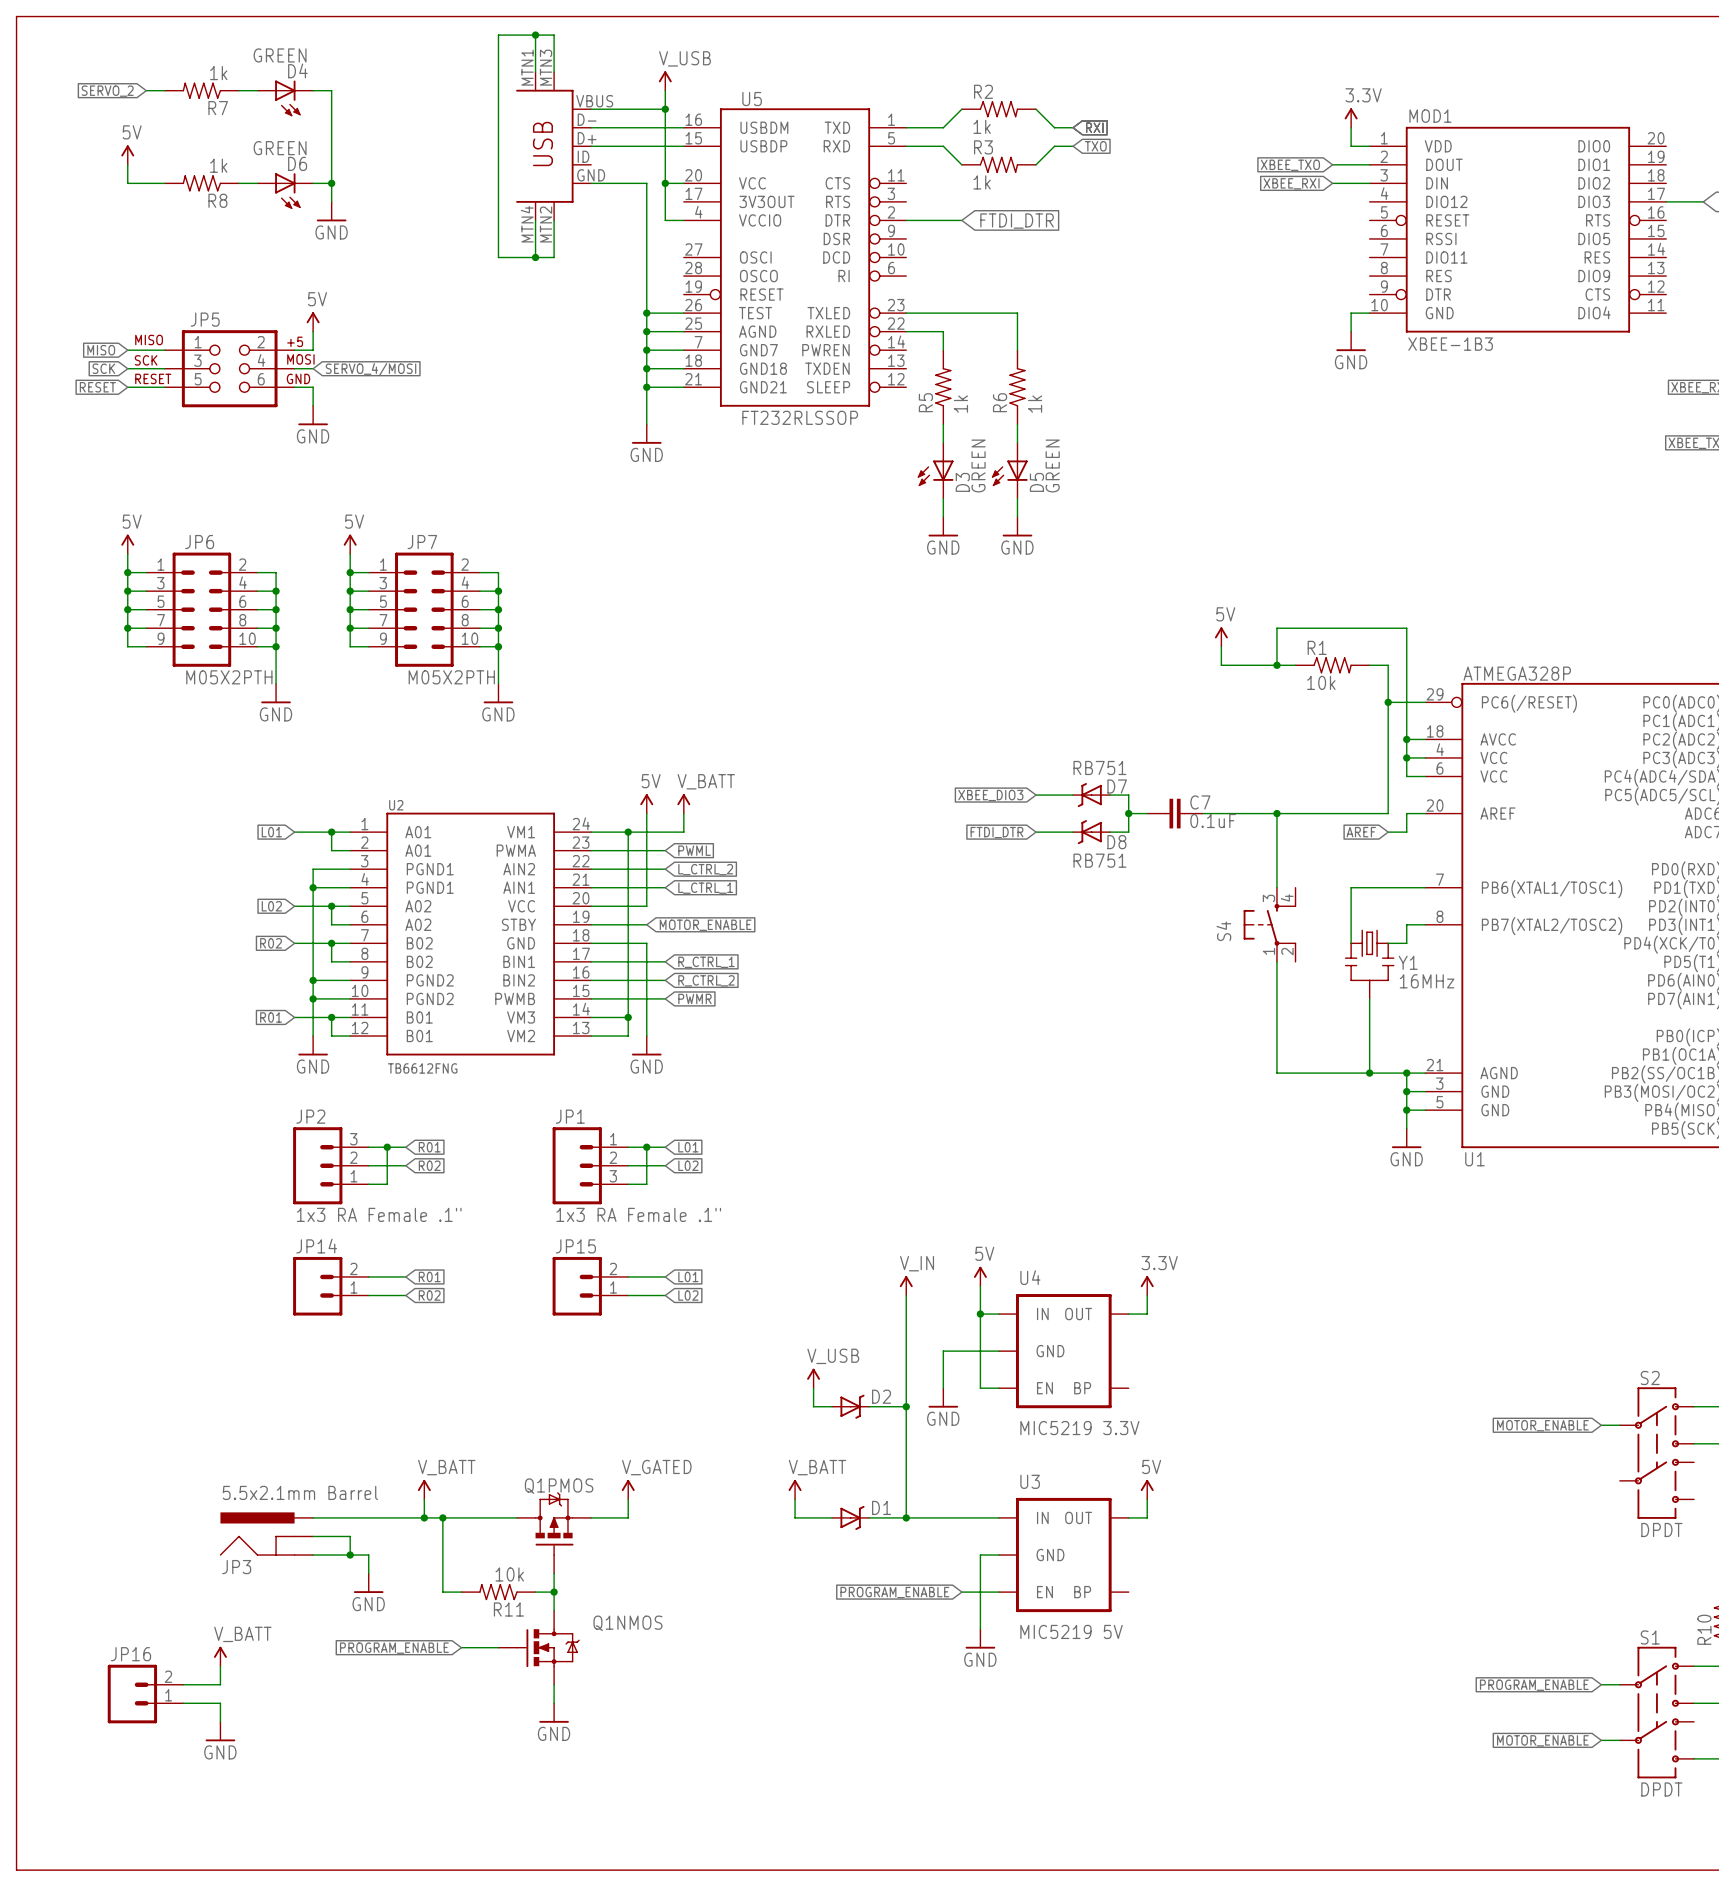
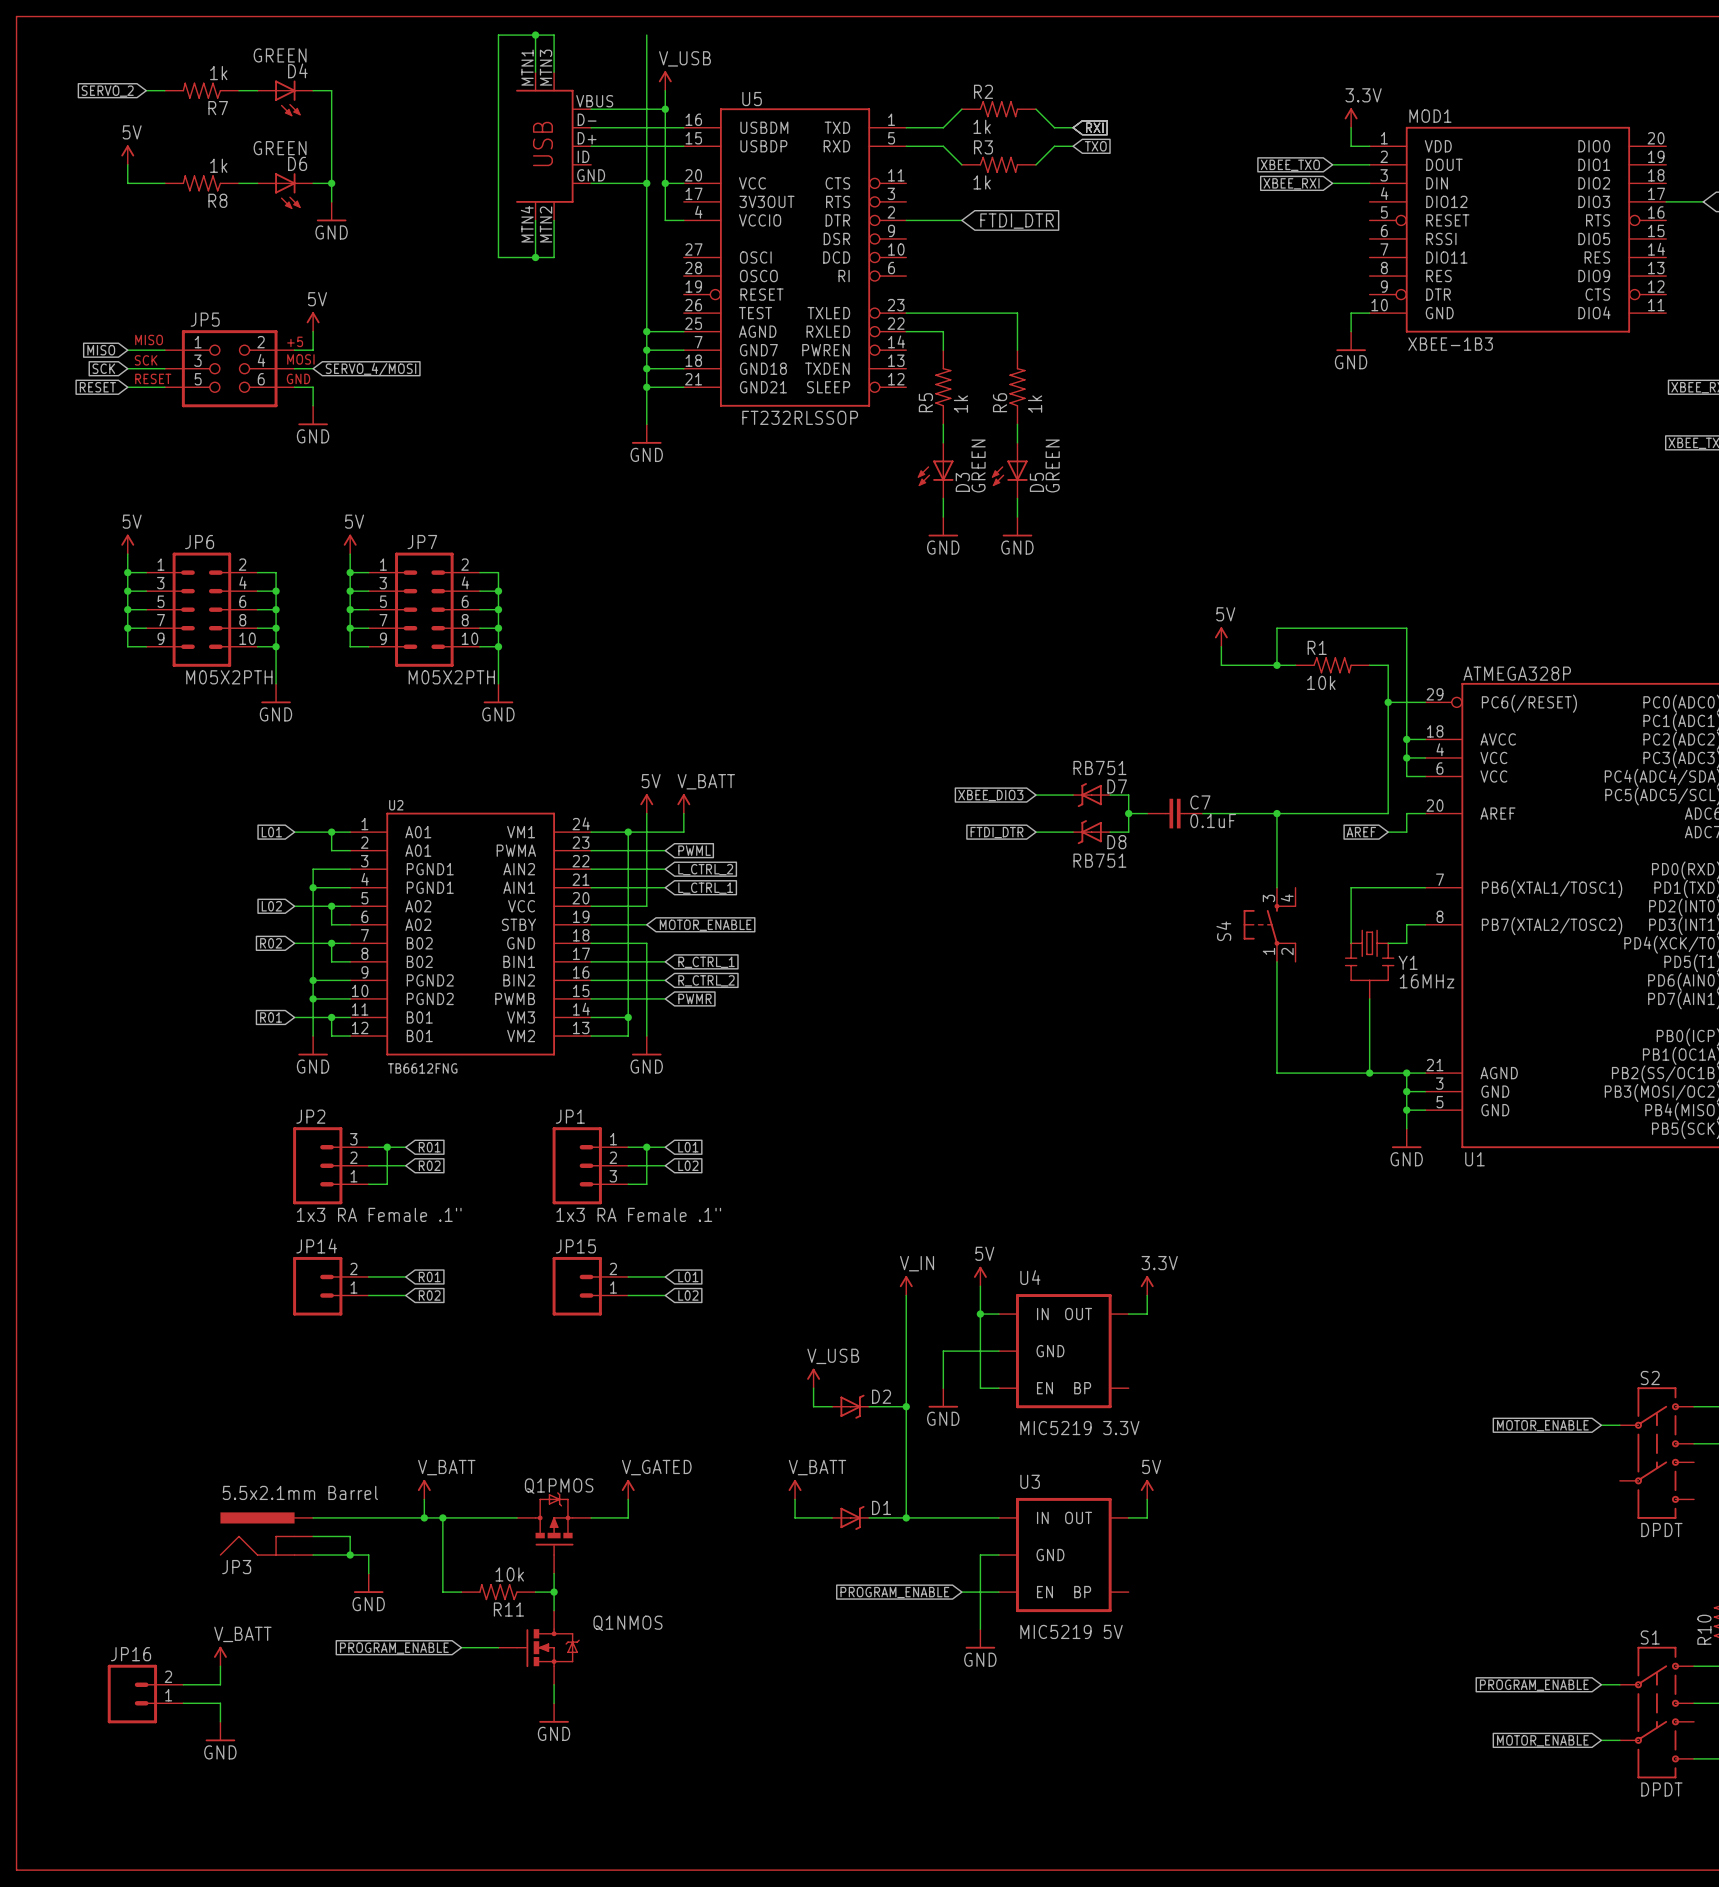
wire: none -> (646, 35) (646, 183)
junction: none -> (646, 183)
wire: (646, 313) (683, 313) -> none
junction: (646, 313) -> none

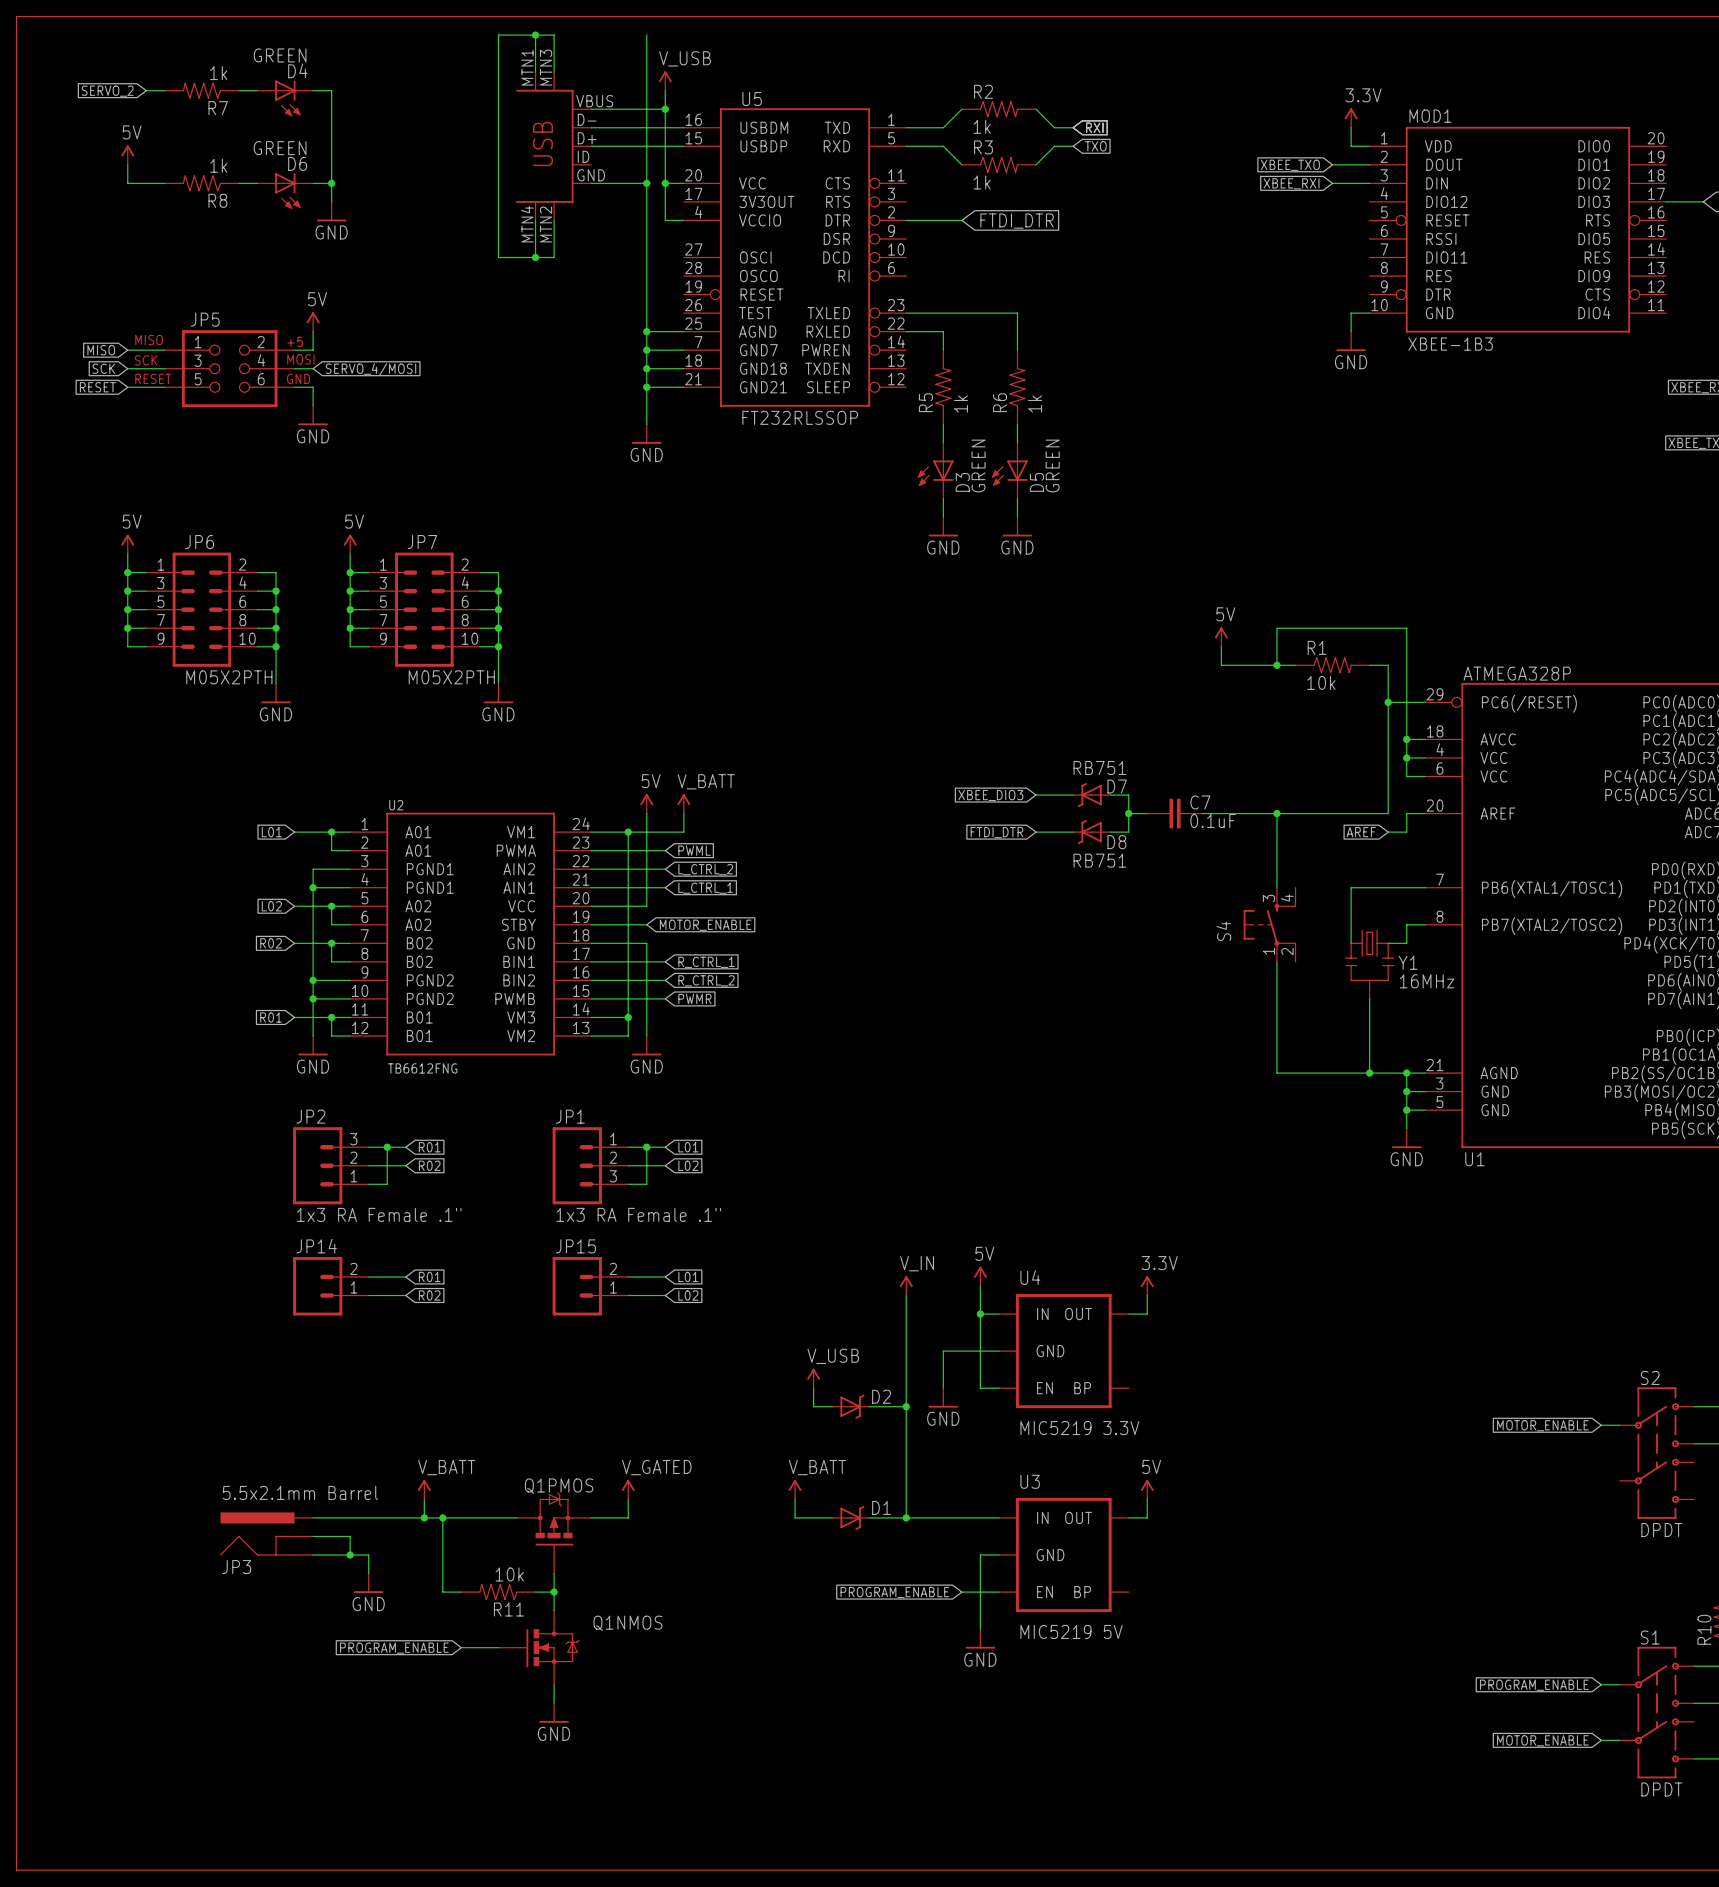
power symbol: V_BATT (220, 1656) -> none
wire: (220, 1666) (220, 1684) (183, 1684) -> none
JP16: (145, 1694) -> none
wire: (183, 1703) (220, 1703) (220, 1721) -> none
power symbol: GND (220, 1731) -> none

